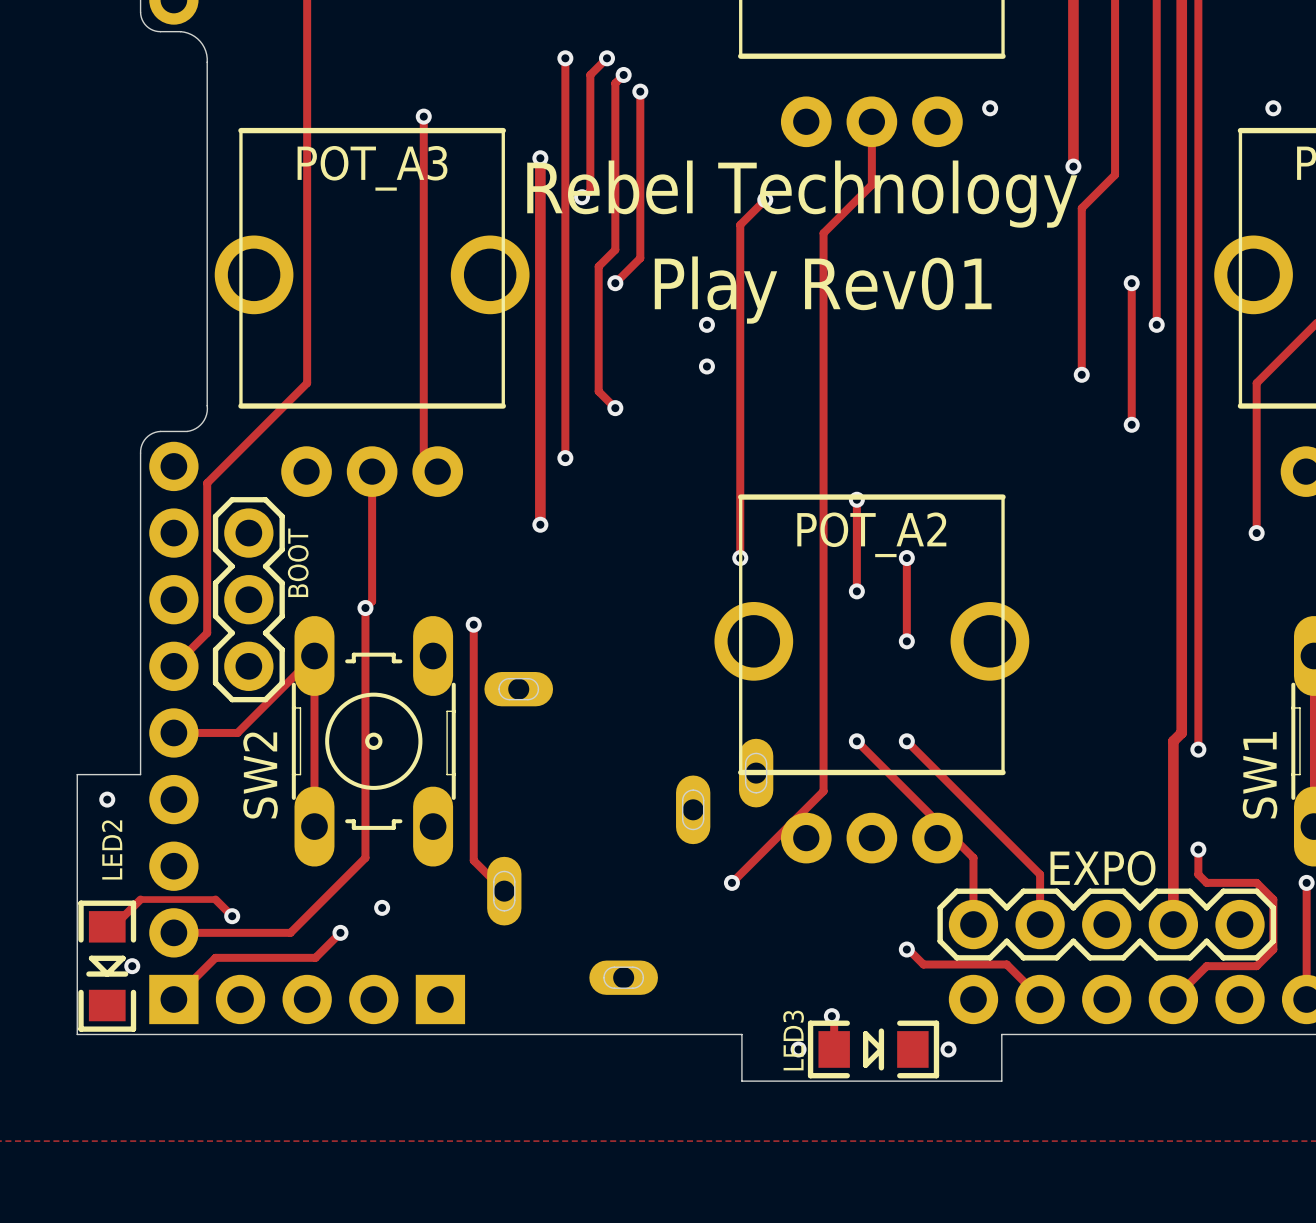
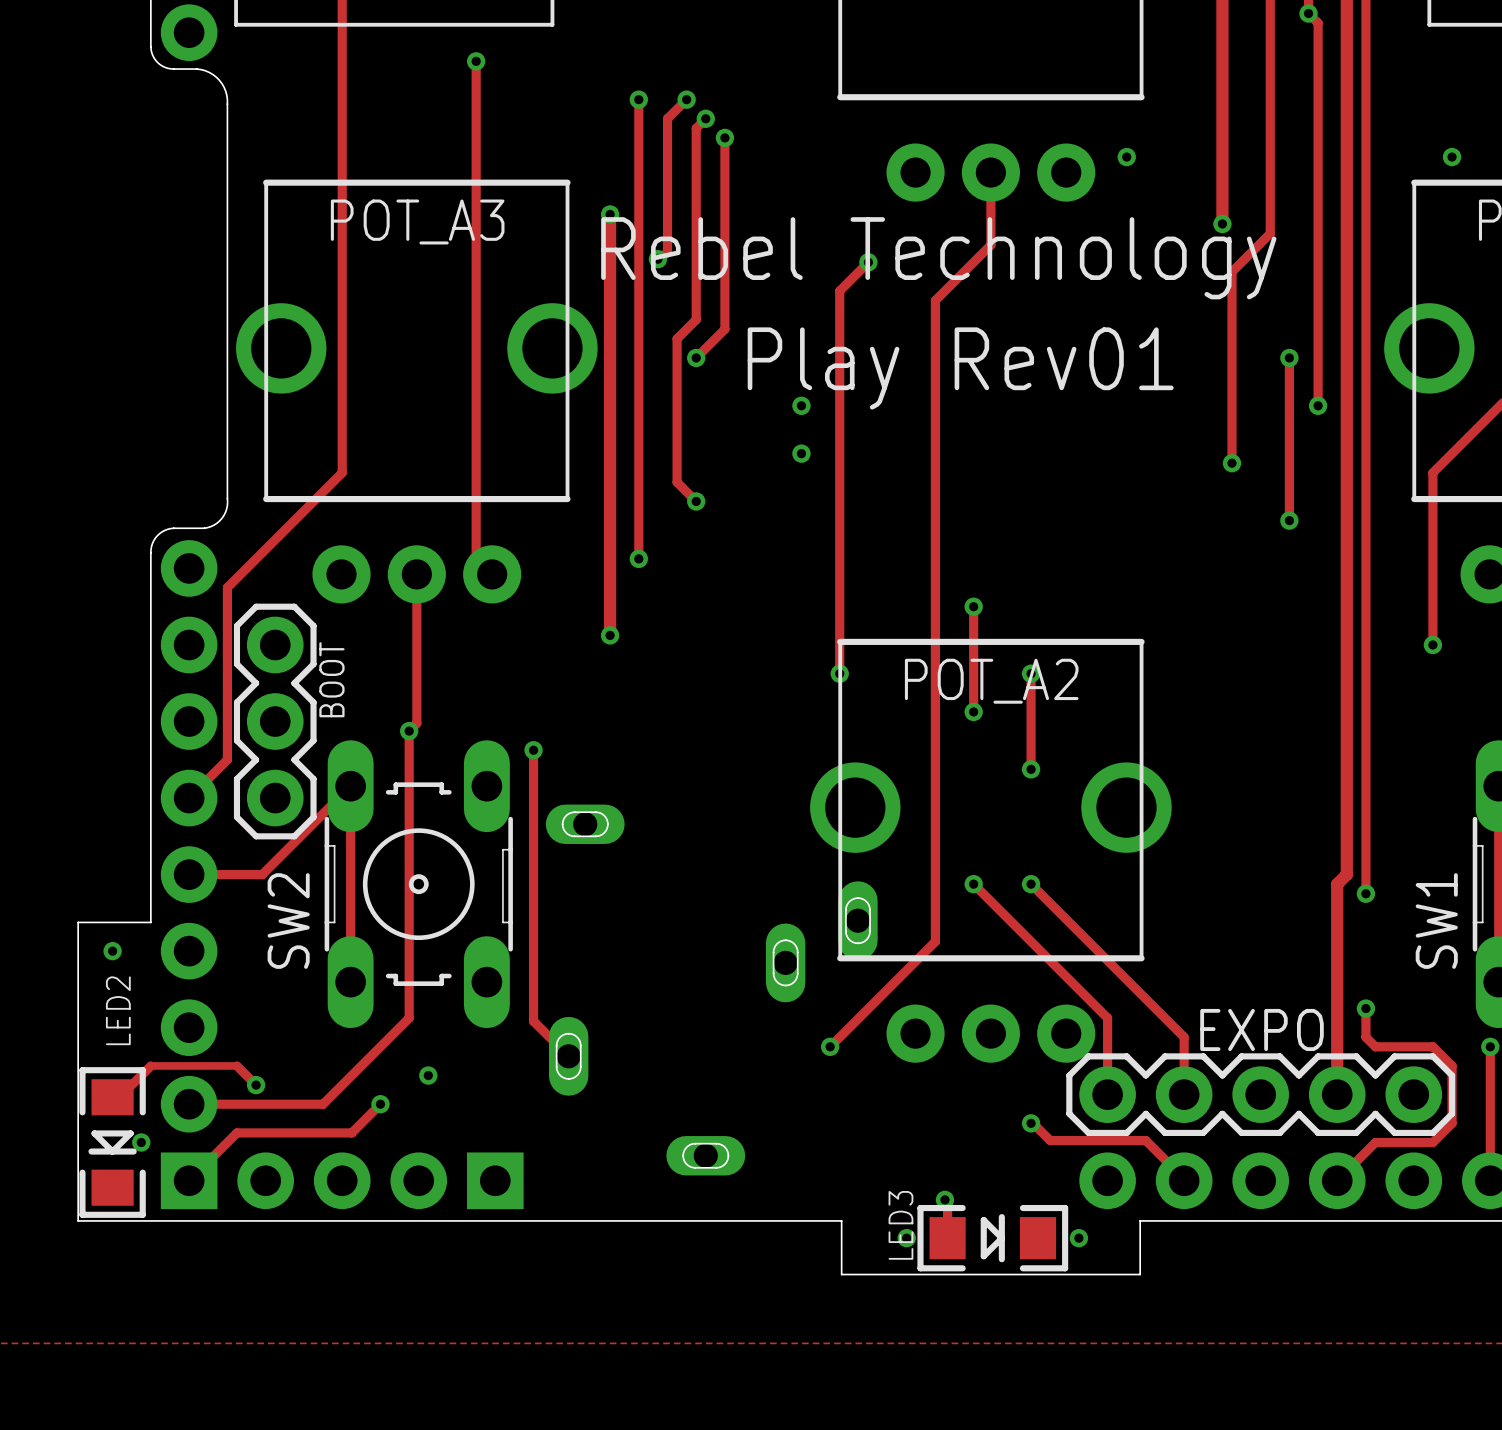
track: none -> (476, 61) (476, 166)
via position: (423, 116) -> (476, 61)
POT_A2 position: (871, 678) -> (990, 850)

